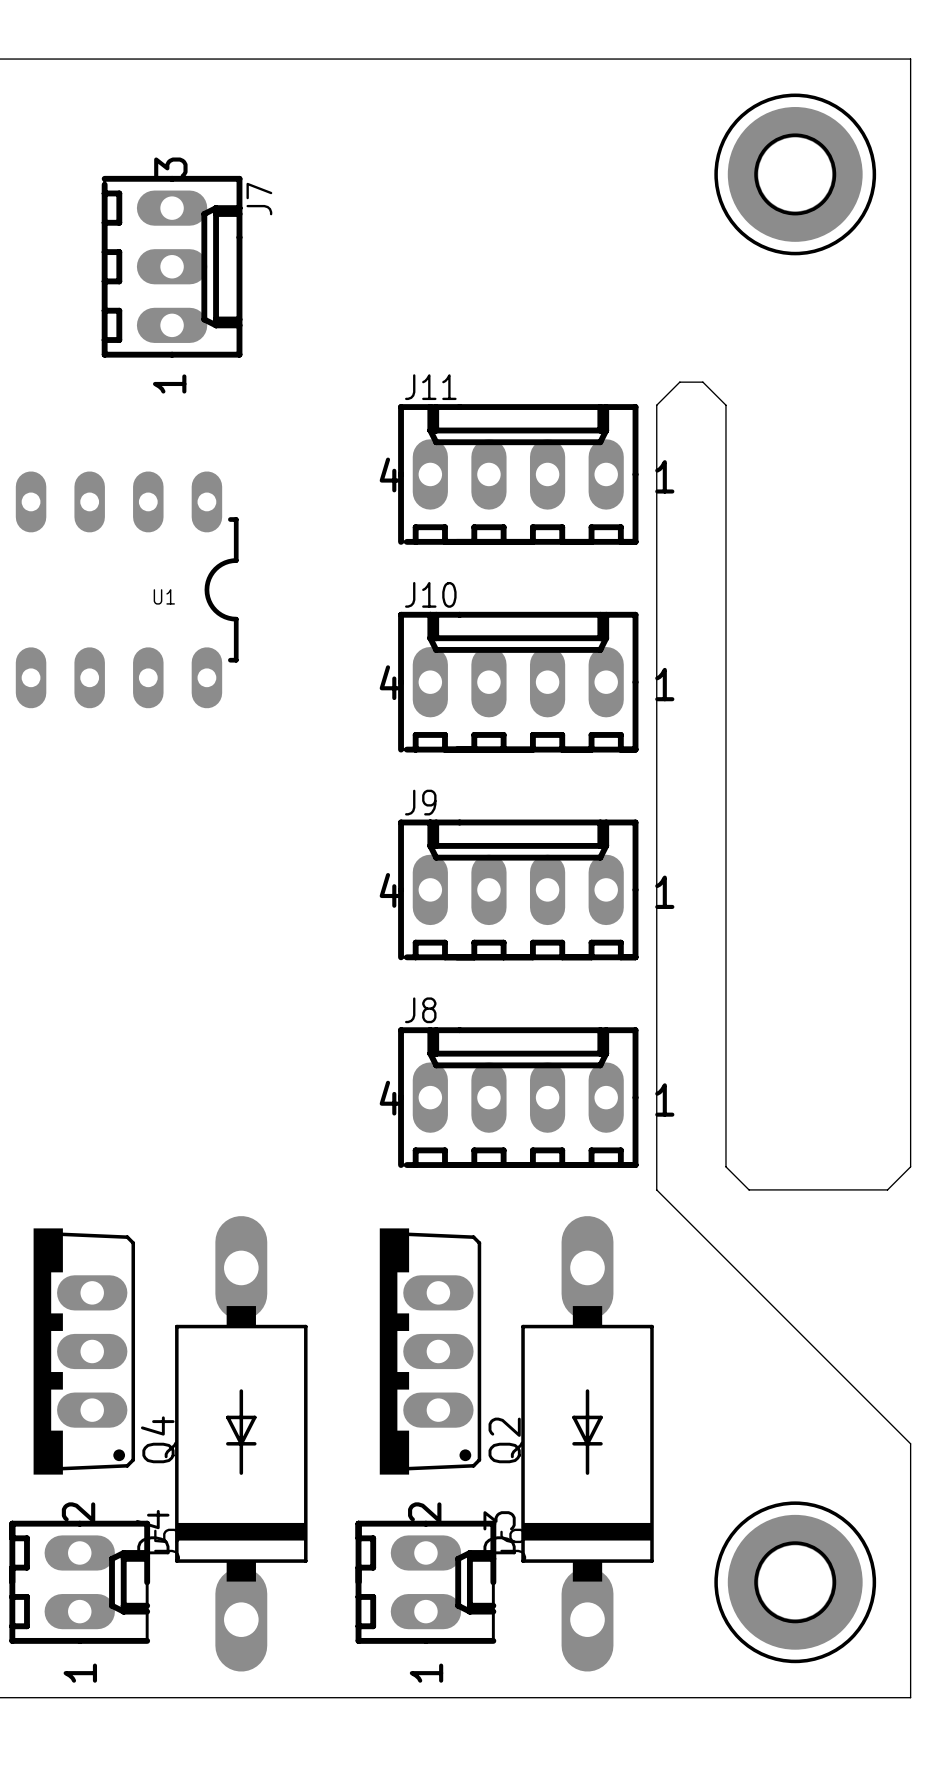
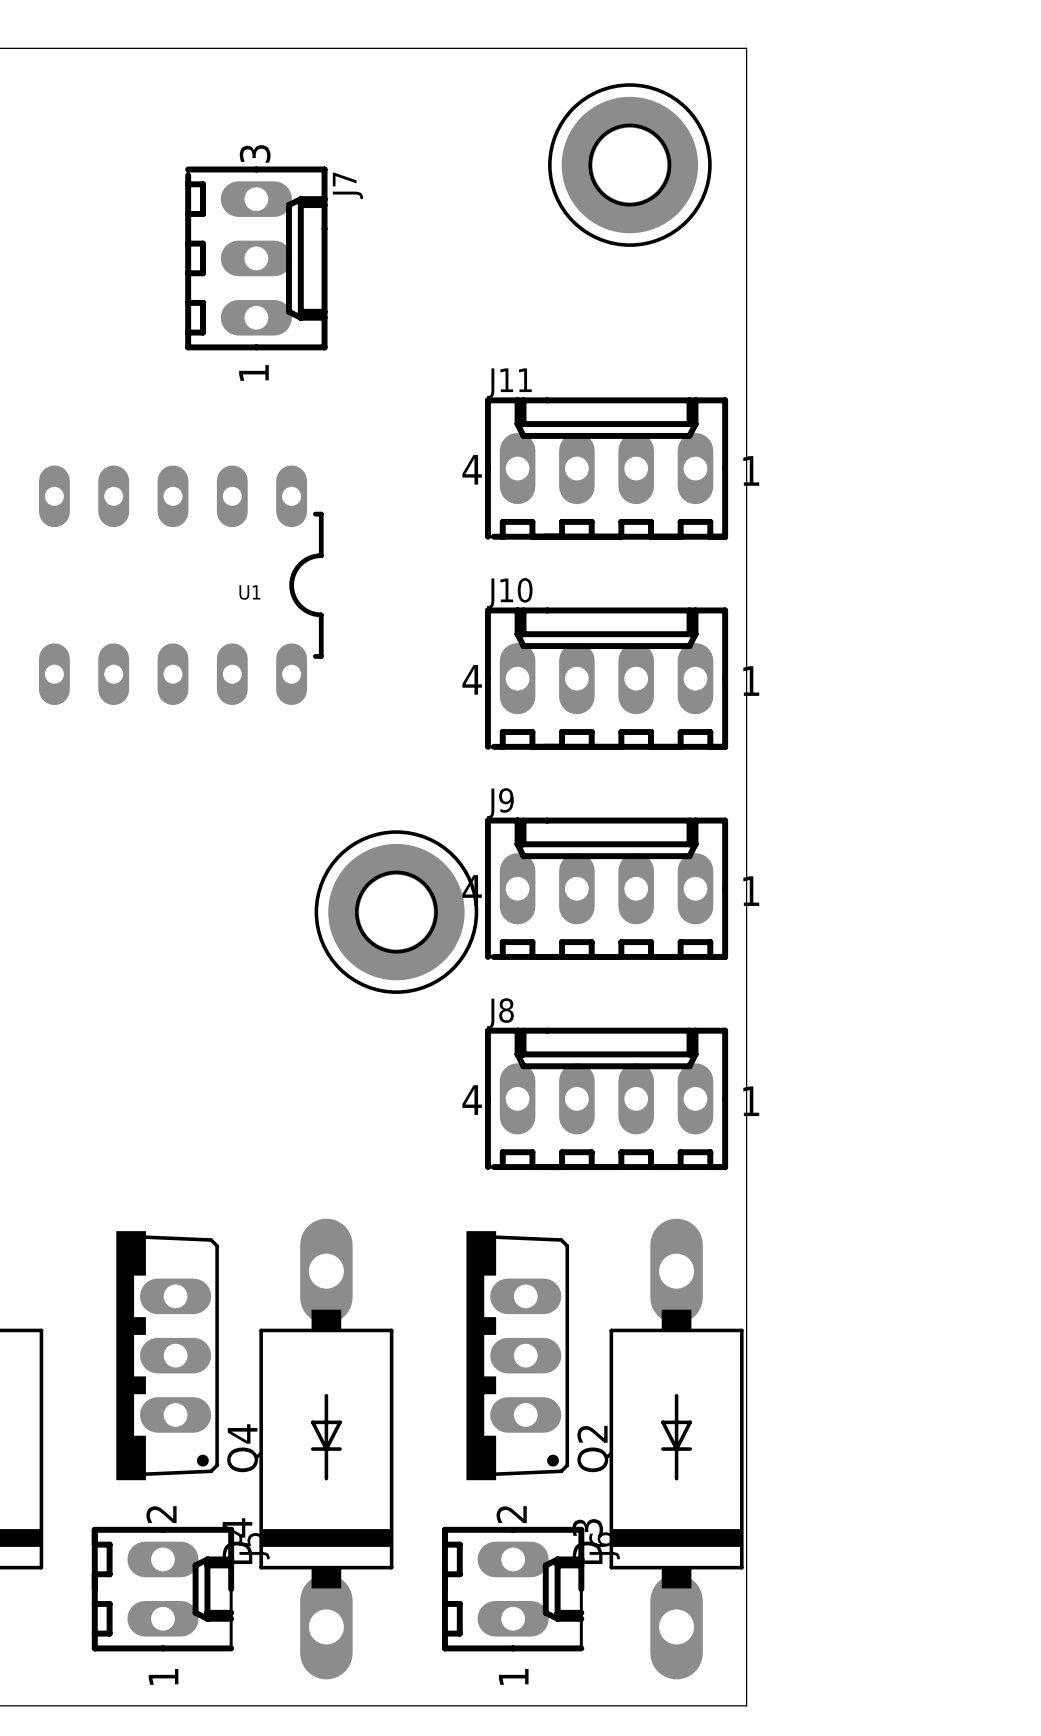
board edge: (656, 59) (910, 59) (910, 1166) (887, 1189) (749, 1189) (725, 1166) (725, 405) (702, 382) (679, 382) (656, 405) -> (746, 48) (746, 398)
part position: (795, 174) -> (629, 165)
part: none -> (396, 912)
board edge: (656, 1189) (910, 1443) (910, 1697) (656, 1697) -> (746, 1192) (746, 1705)
part: (795, 1582) -> none

